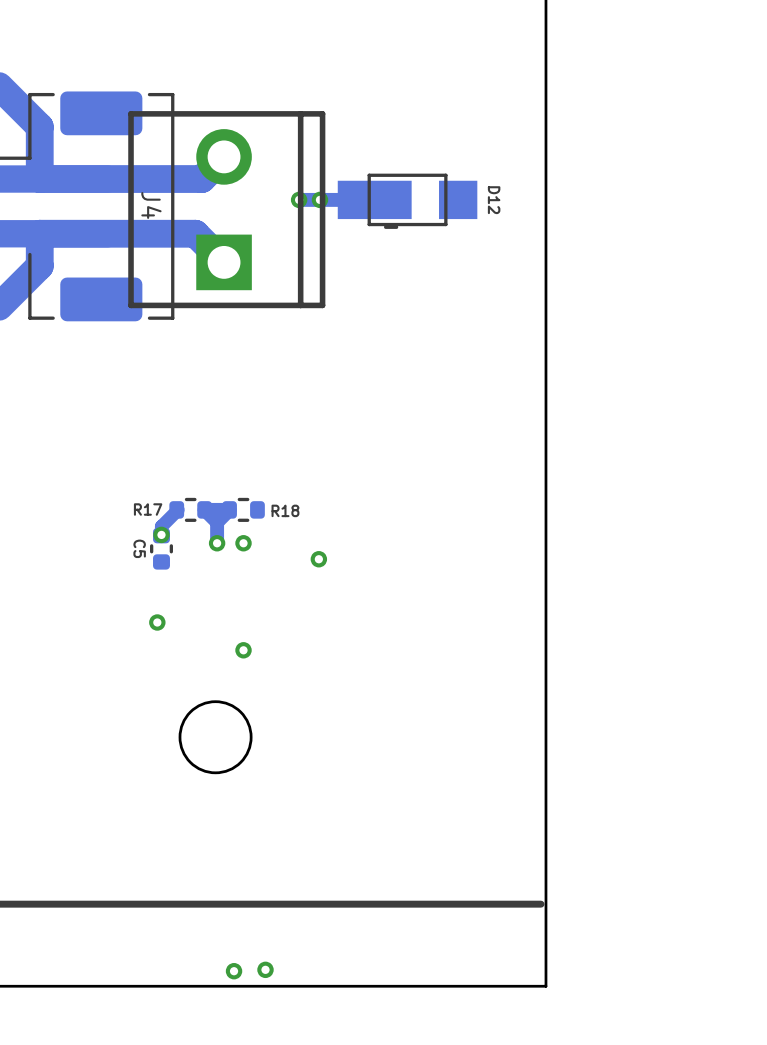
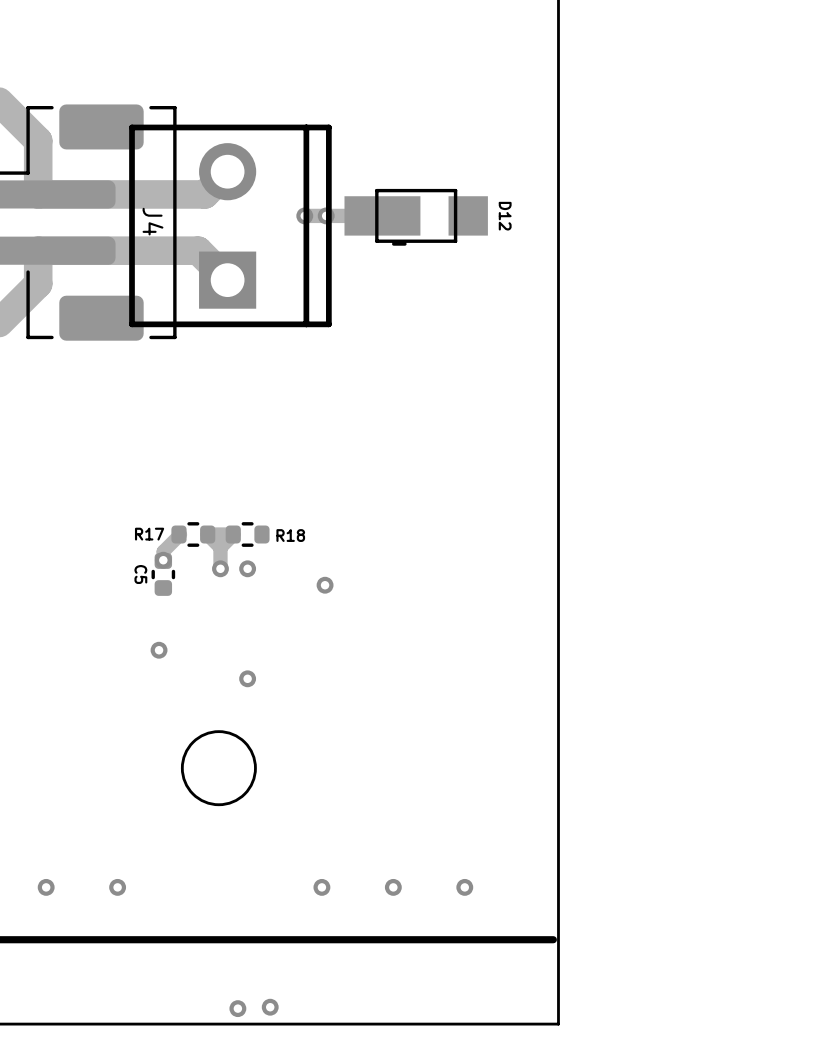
via: none -> (46, 887)
via: none -> (117, 887)
via: none -> (321, 887)
via: none -> (393, 887)
via: none -> (464, 887)

